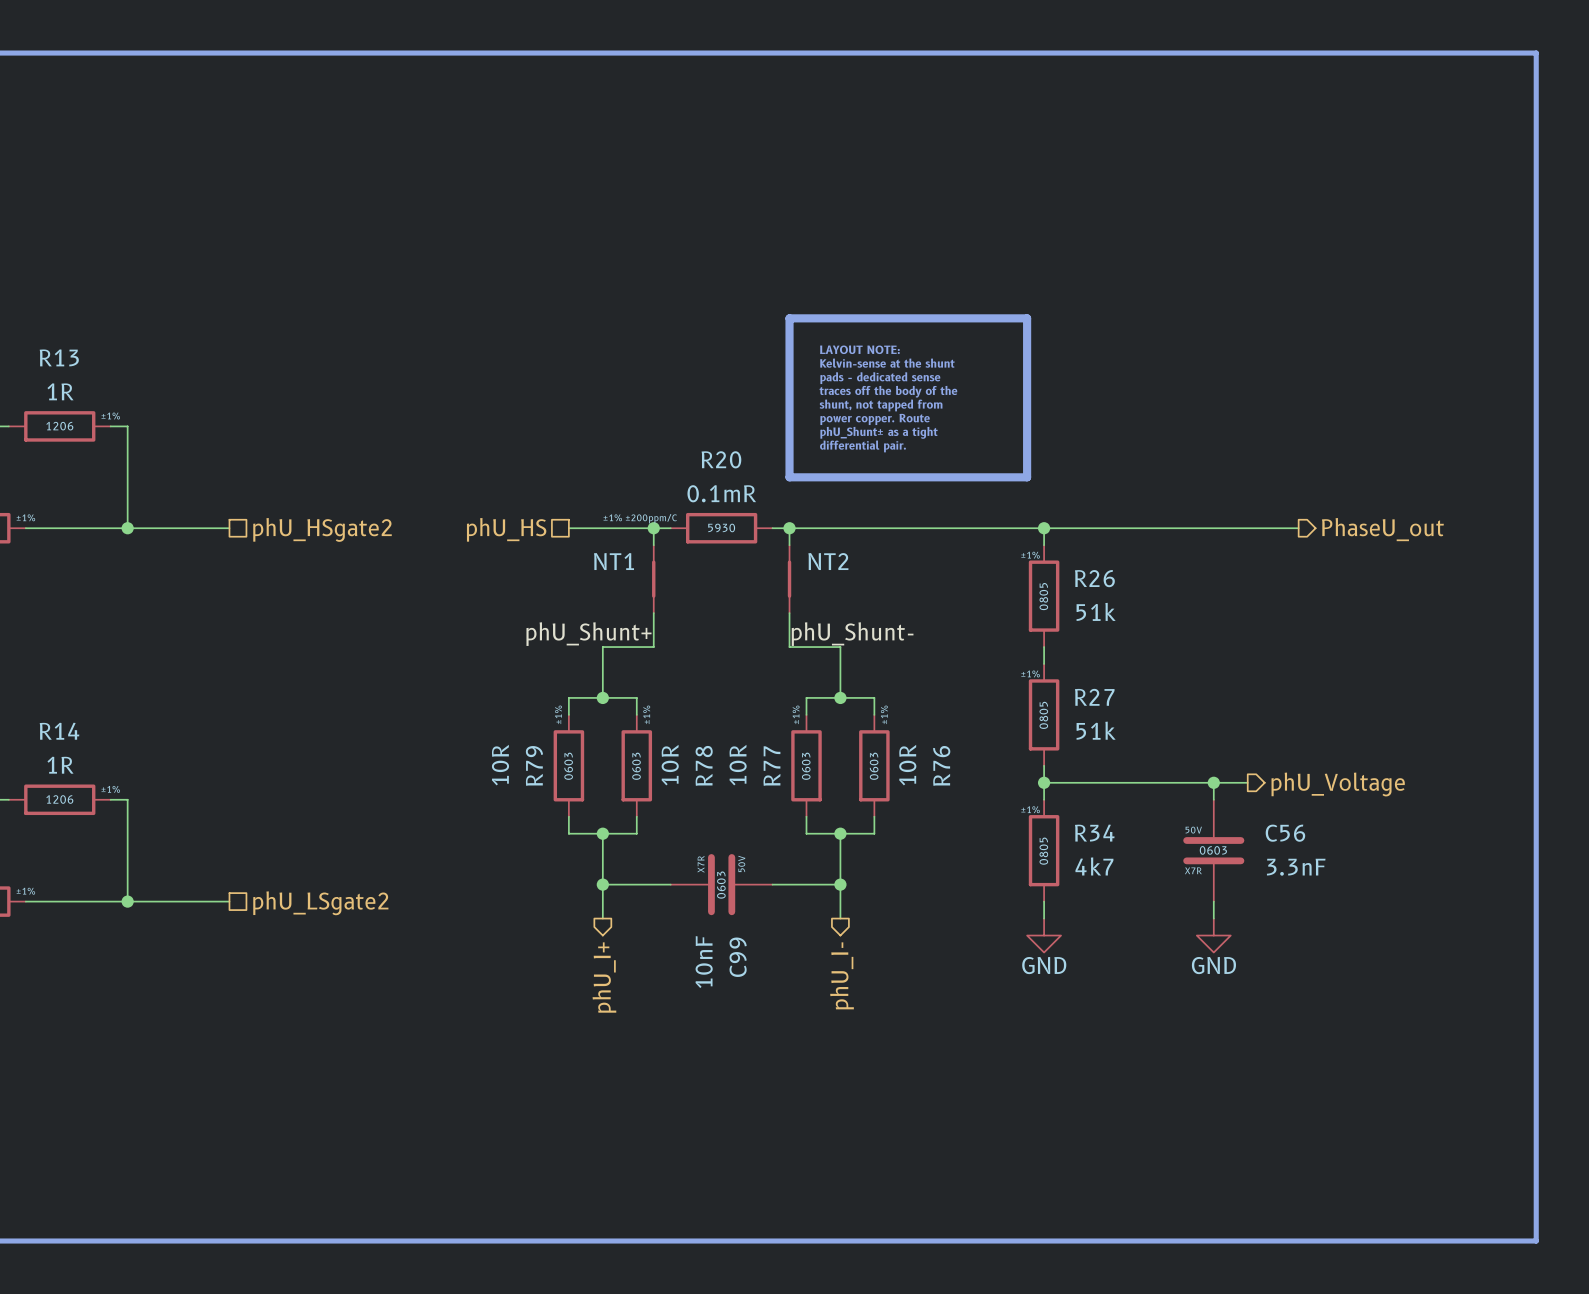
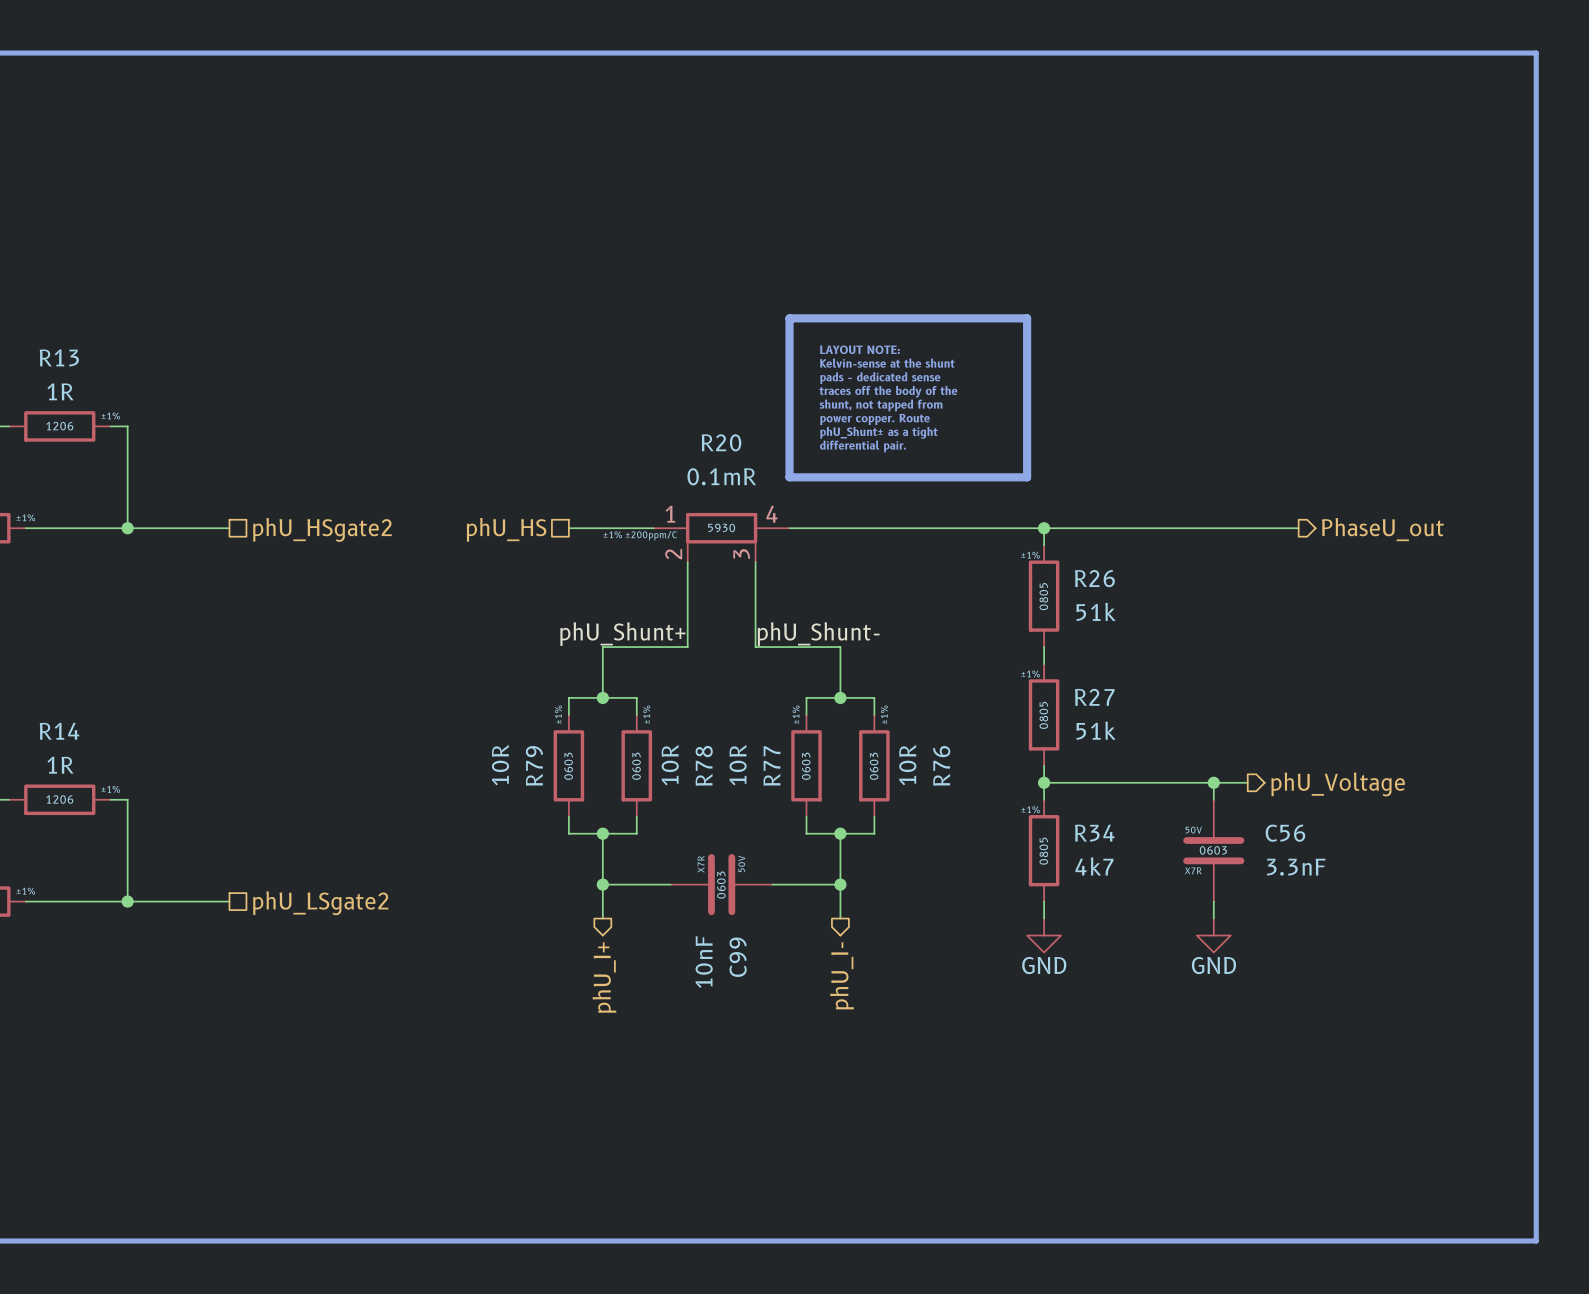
R20 symbol: [670, 512, 773, 544] -> [653, 512, 790, 563]
junction: (653, 528) -> none
wire: (772, 528) (789, 528) (789, 545) -> none
junction: (789, 528) -> none
NT1: (653, 579) -> none
NT2: (789, 579) -> none
wire: (653, 613) (653, 647) -> (687, 562) (687, 647) (653, 647)
wire: (789, 613) (789, 647) -> (755, 562) (755, 647) (789, 647)
label position: phU_Shunt+ (588, 634) -> phU_Shunt+ (622, 634)
label position: phU_Shunt- (852, 634) -> phU_Shunt- (818, 634)

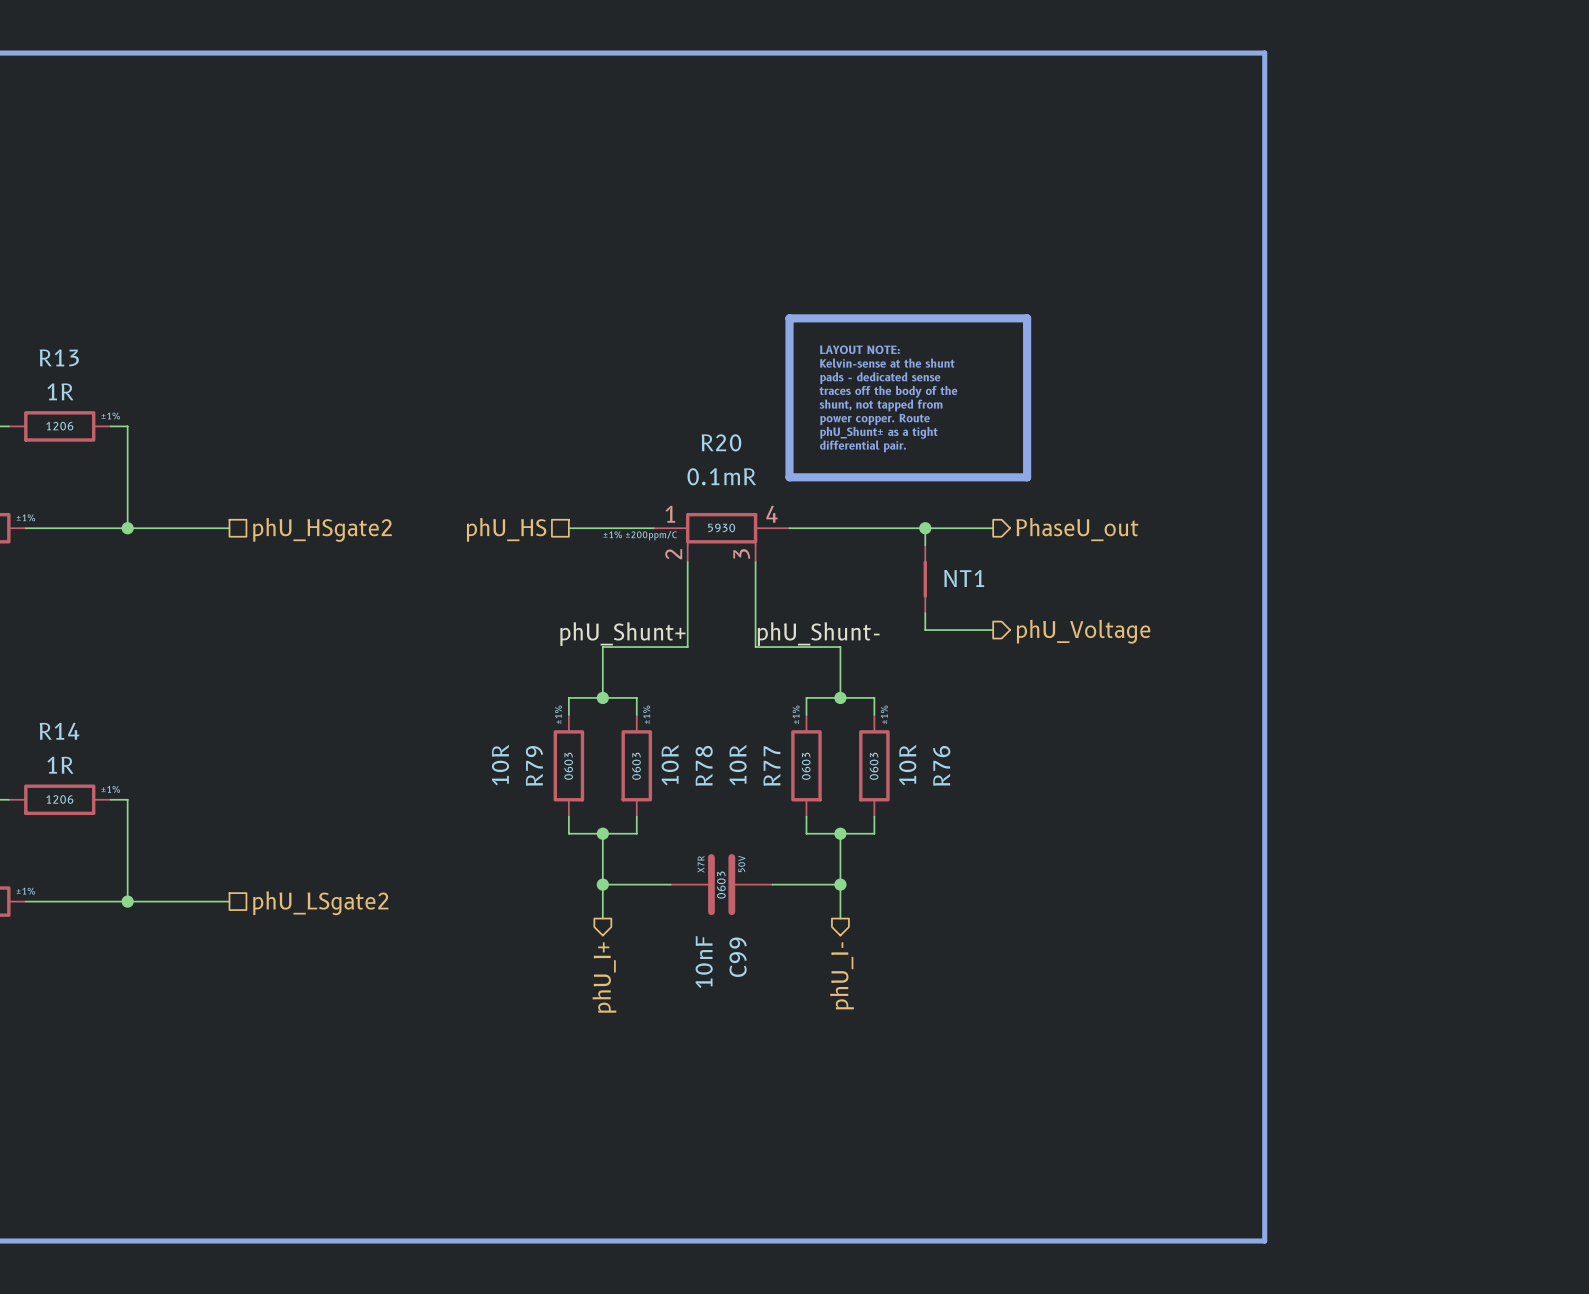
line: (1264, 53) (1536, 53) (1536, 1241) (1264, 1241) -> (1264, 53) (1264, 1241)
junction: none -> (925, 528)
wire: (993, 528) (1298, 528) -> none
wire: (1044, 528) (1044, 545) -> (925, 528) (925, 545)
junction: (1044, 528) -> none
hierarchical label position: PhaseU_out (1382, 529) -> PhaseU_out (1077, 529)
NT1: none -> (925, 579)
R26: 51k (1044, 596) -> none
wire: none -> (925, 613) (925, 630) (993, 630)
wire: (1044, 647) (1044, 664) -> none
R27: 51k (1044, 714) -> none
wire: (1044, 765) (1044, 799) -> none
wire: (1044, 782) (1247, 782) -> none
junction: (1044, 782) -> none
wire: (1213, 782) (1213, 799) -> none
junction: (1213, 782) -> none
hierarchical label position: phU_Voltage (1338, 784) -> phU_Voltage (1083, 631)
R34: 4k7 (1044, 850) -> none
C56: 3.3nF (1213, 850) -> none
wire: (1044, 901) (1044, 918) -> none
wire: (1213, 901) (1213, 918) -> none
power symbol: GND (1044, 935) -> none
power symbol: GND (1213, 935) -> none

